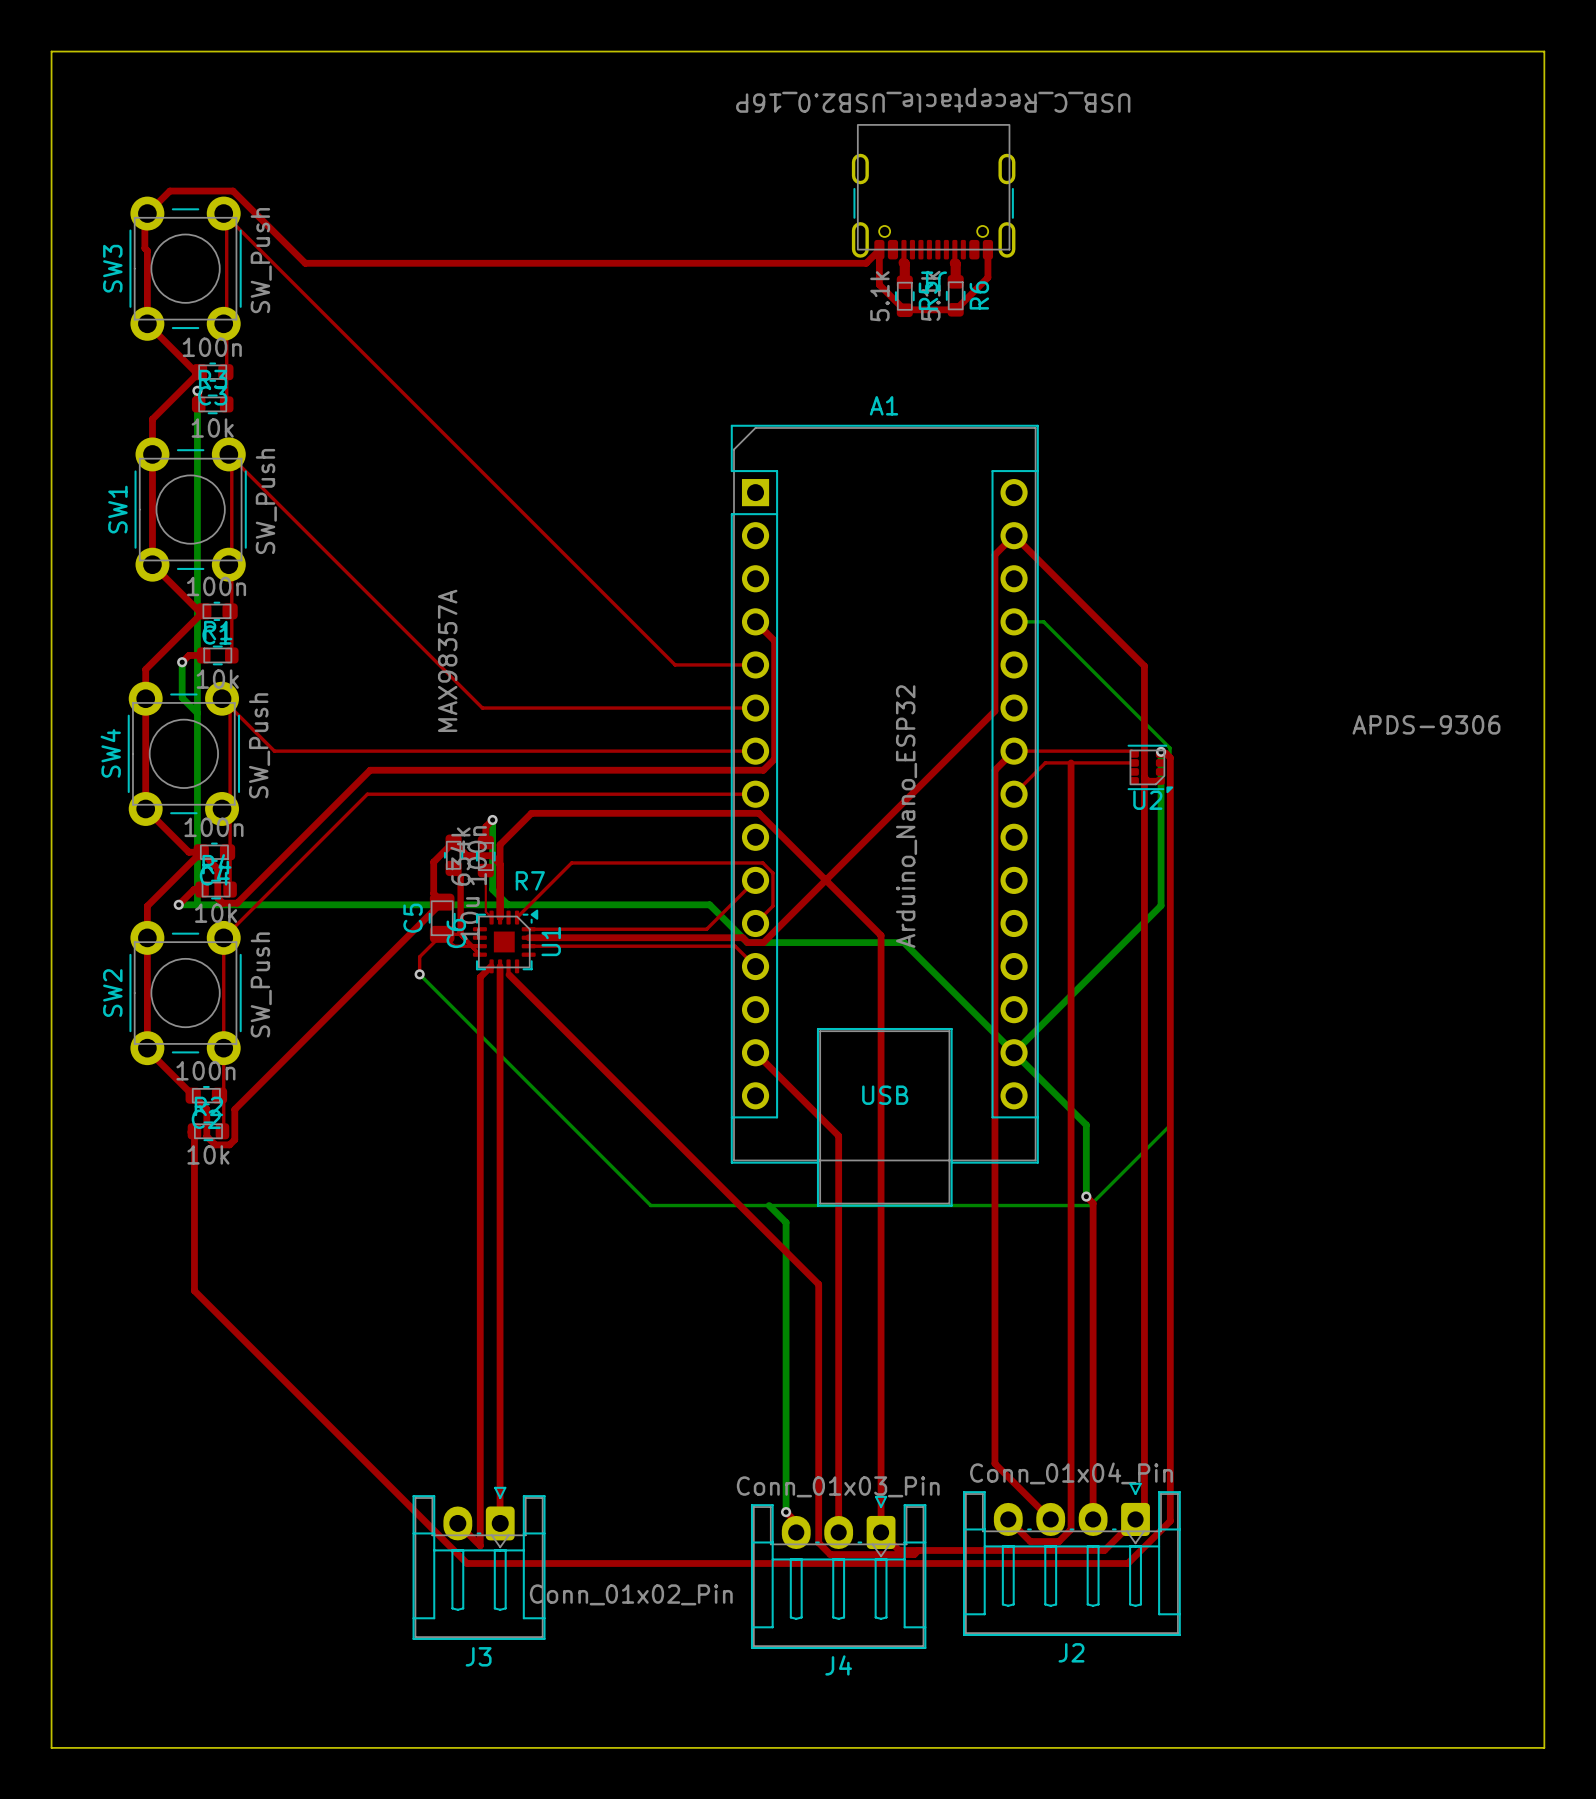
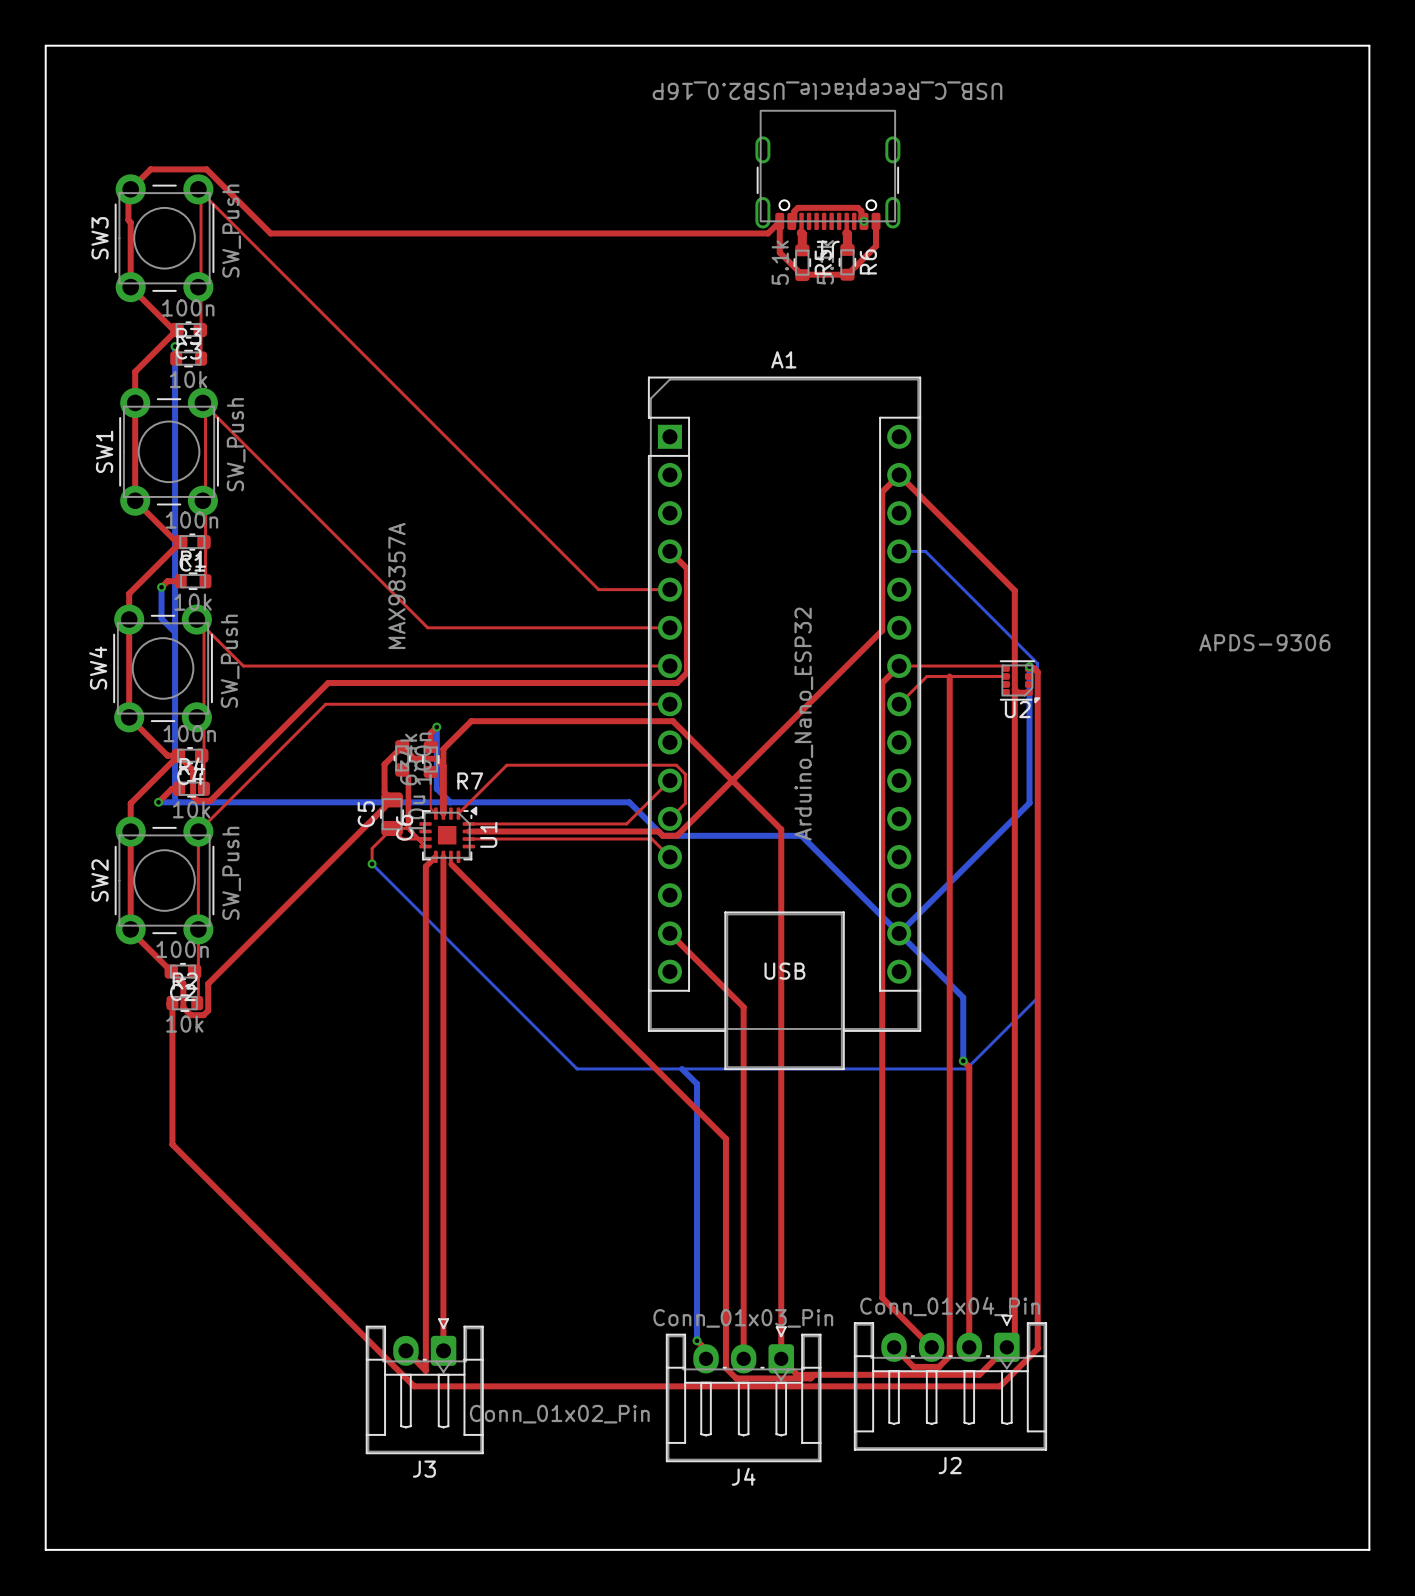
top track: none -> (791, 221) (794, 218) (794, 211) (797, 207) (857, 207) (861, 211) (861, 218) (863, 221)
via: none -> (863, 221)

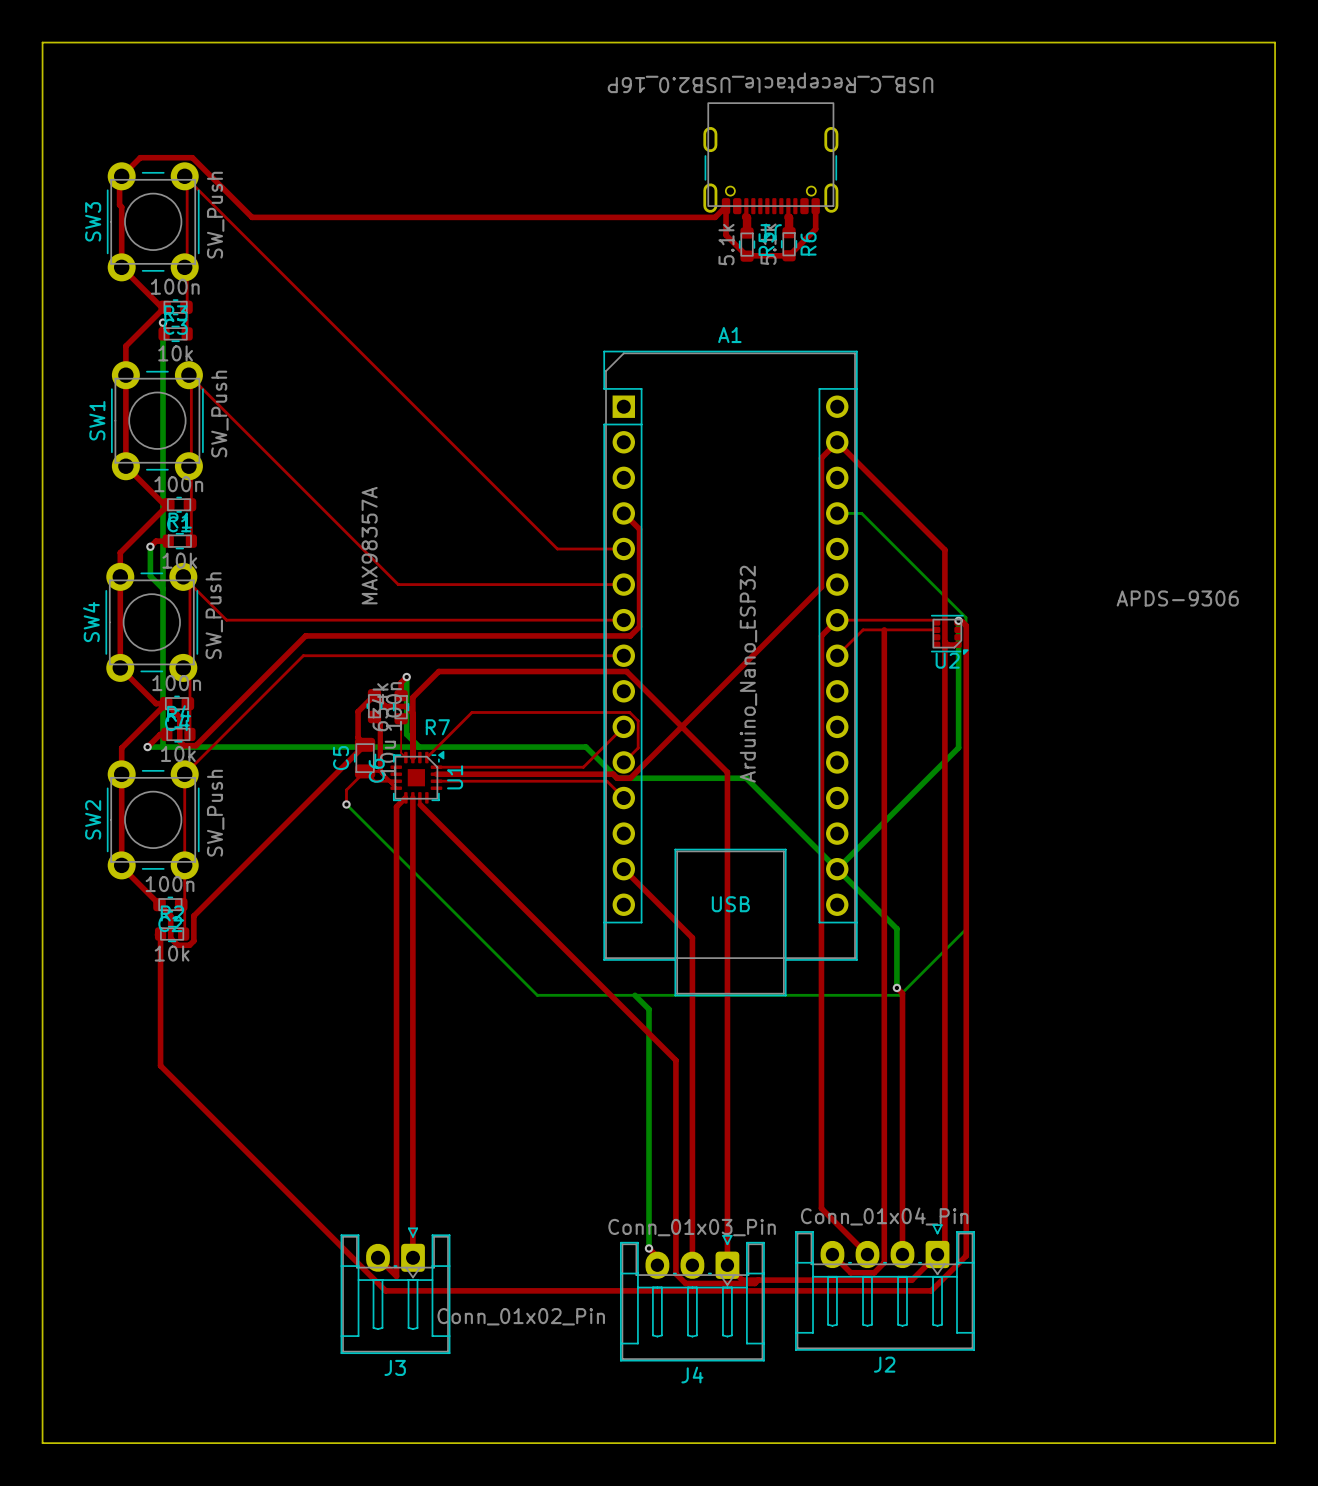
top track: (791, 221) (794, 218) (794, 211) (797, 207) (857, 207) (861, 211) (861, 218) (863, 221) -> none
via: (863, 221) -> none

